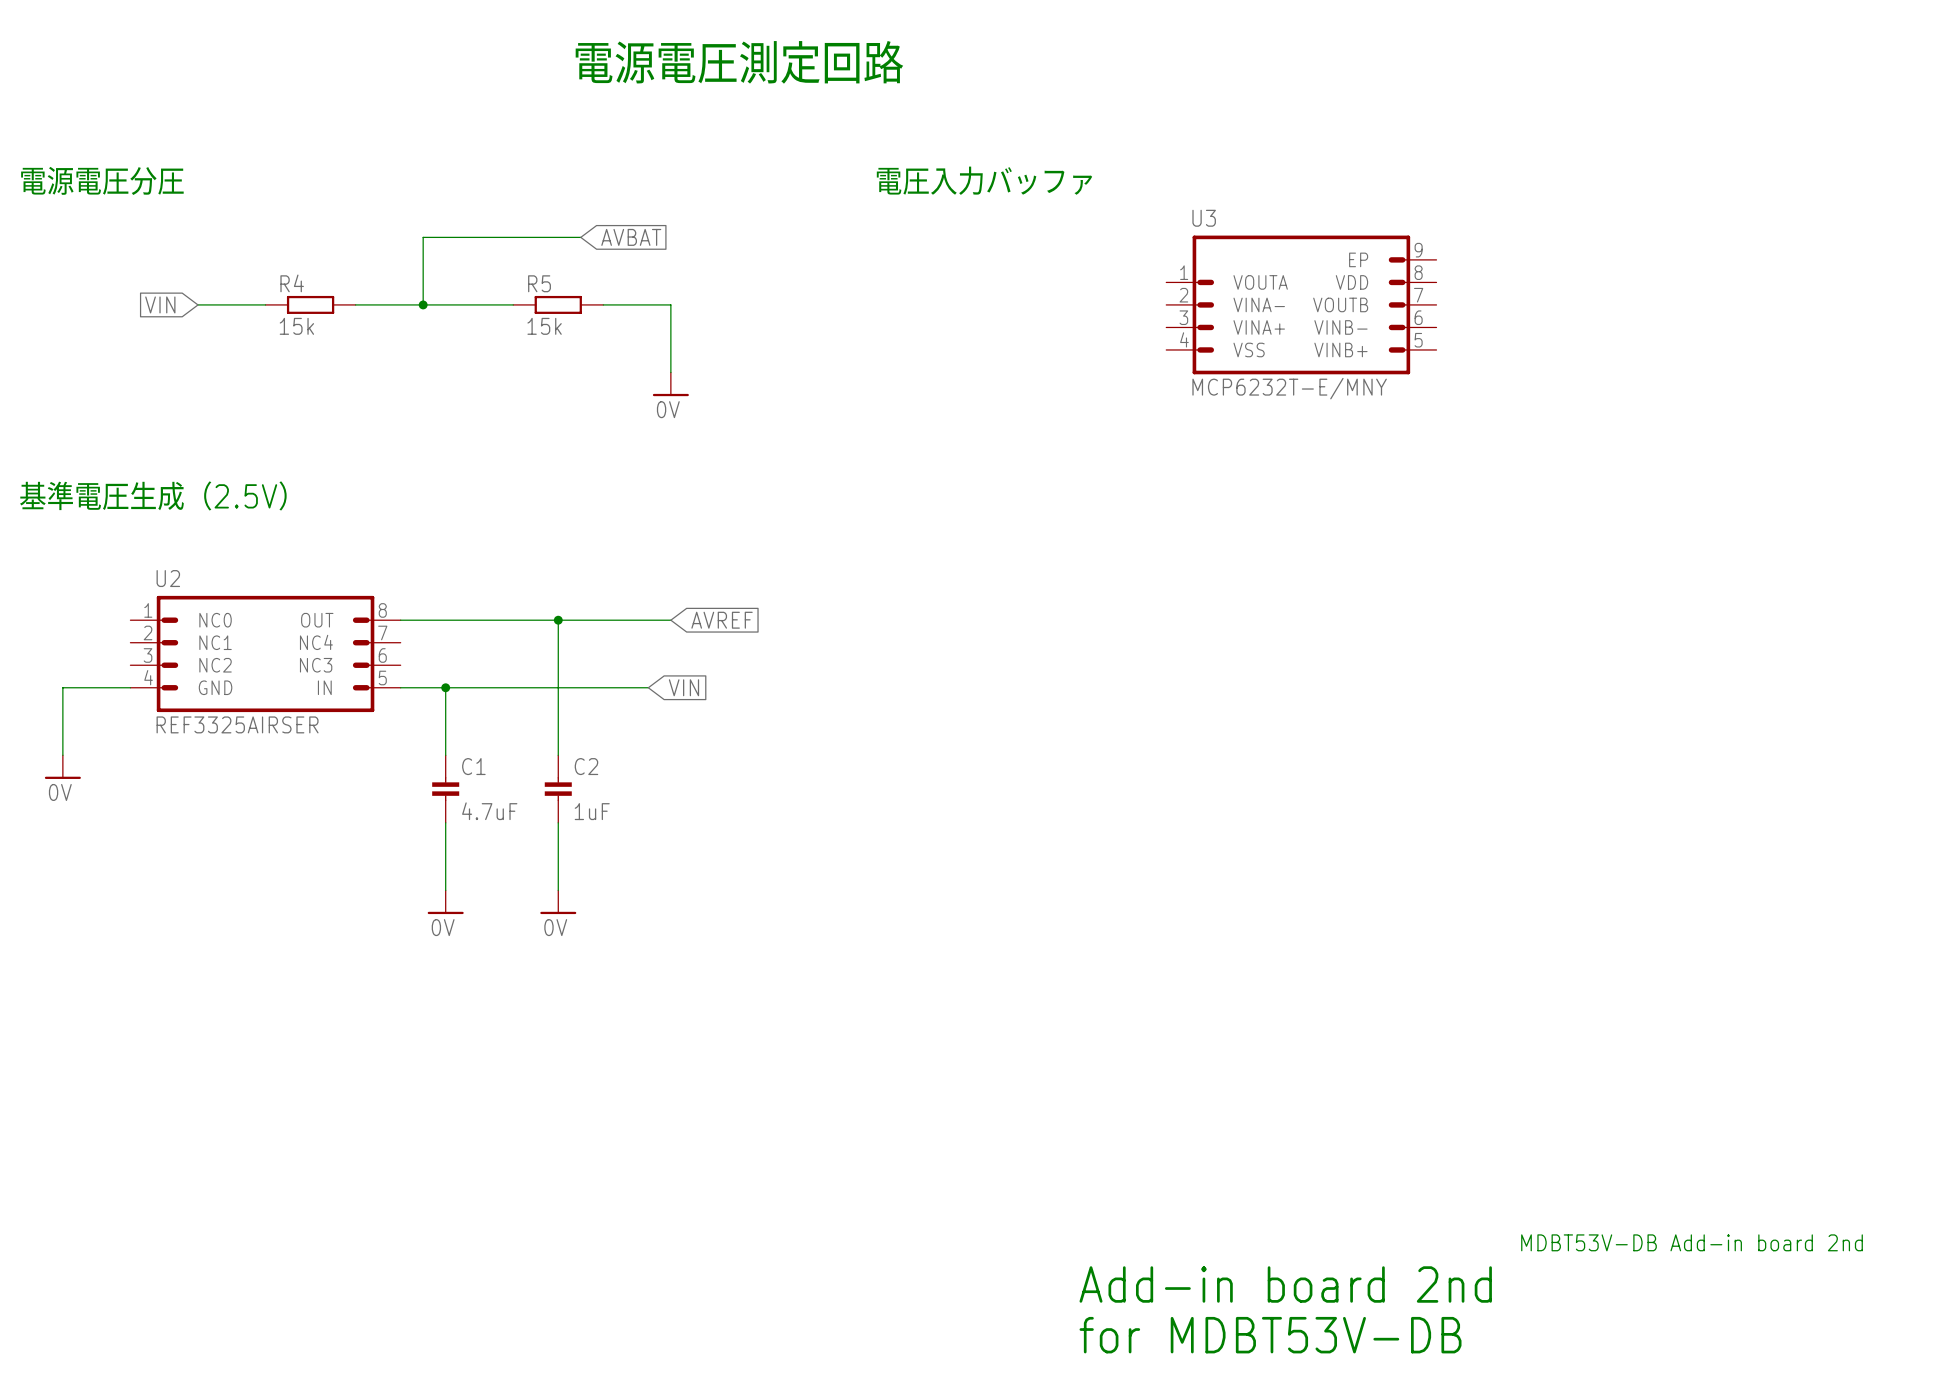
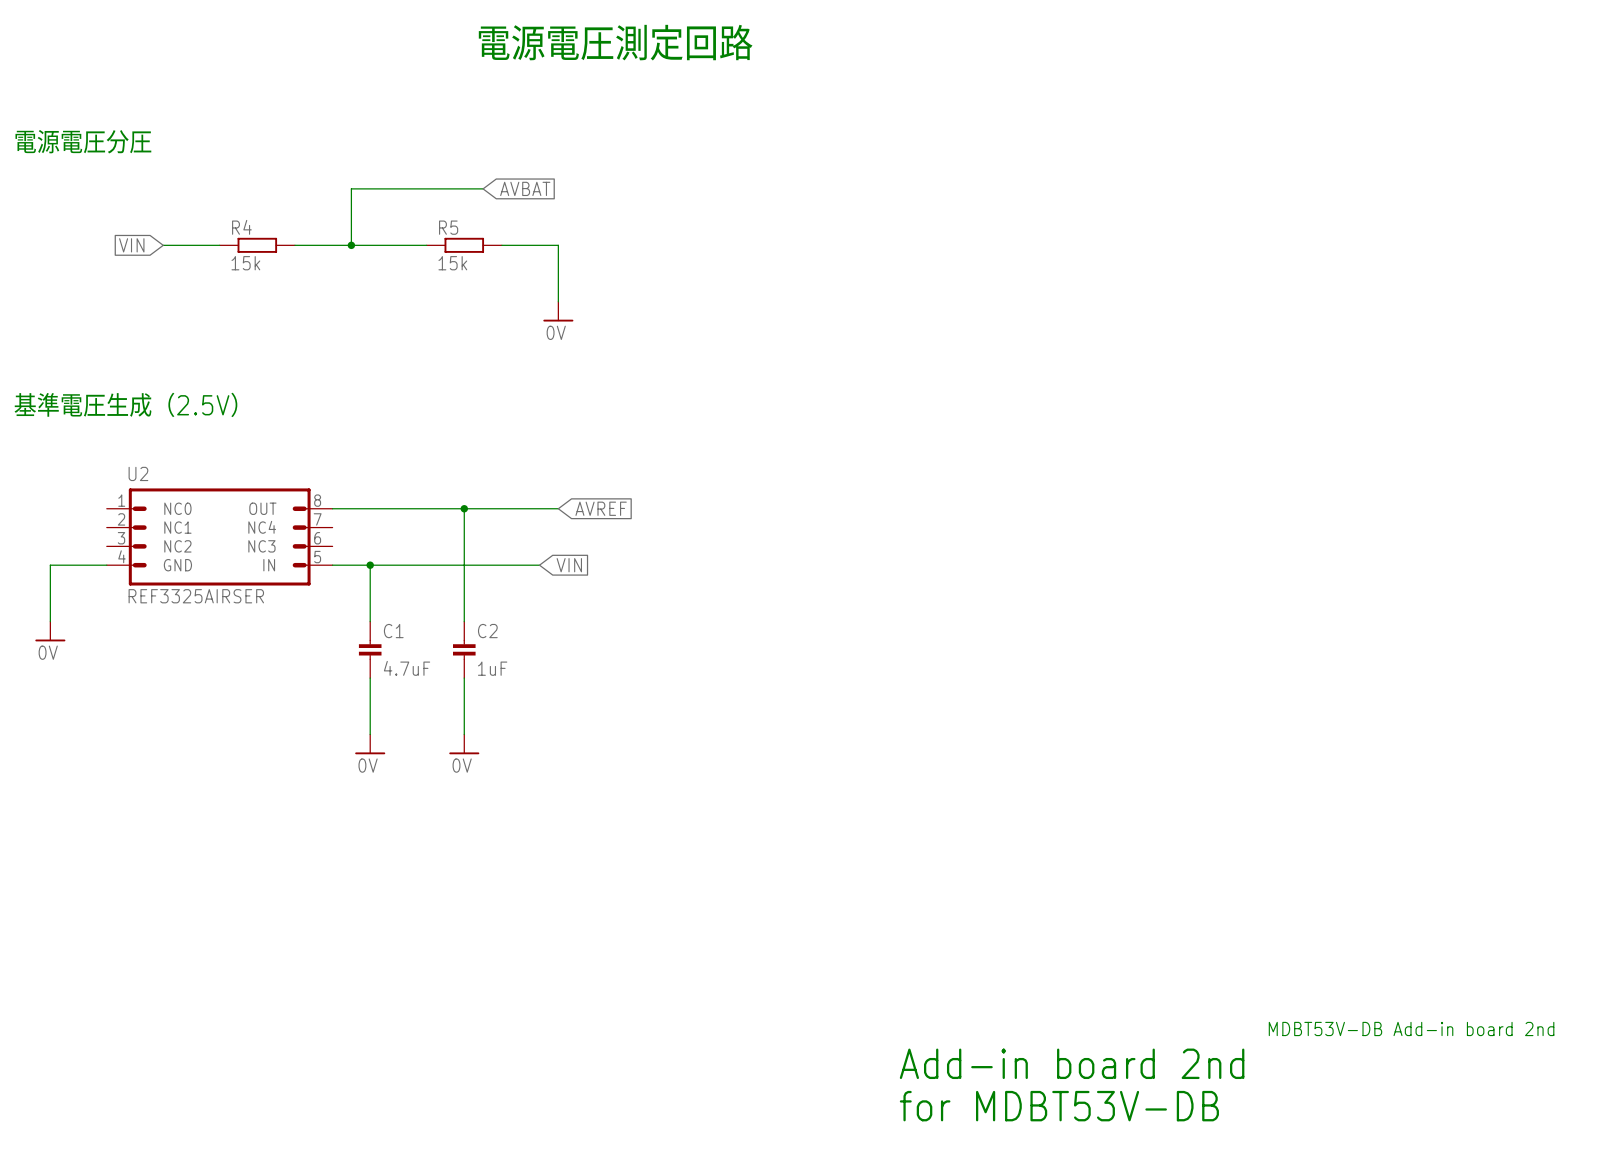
text: 電圧入力バッファ (984, 180) -> none
U3: MCP6232T-E/MNY (1301, 304) -> none

